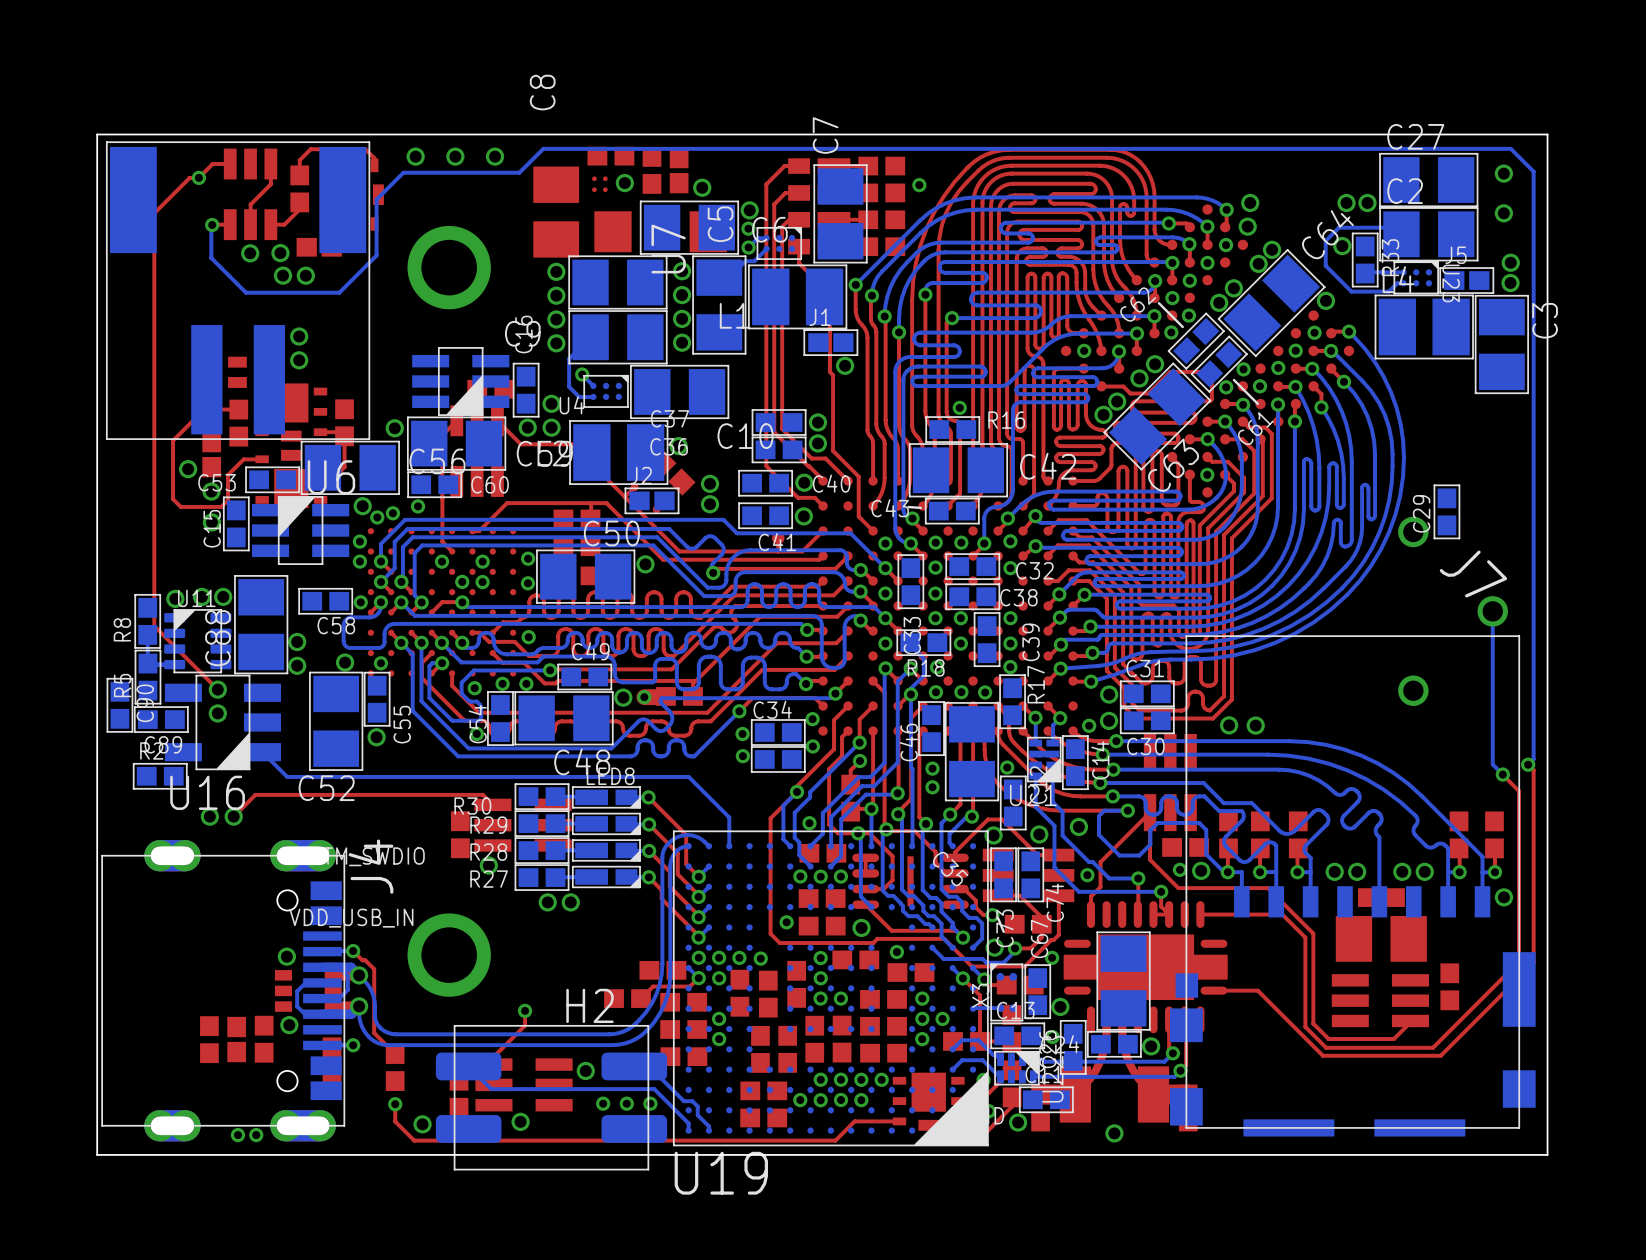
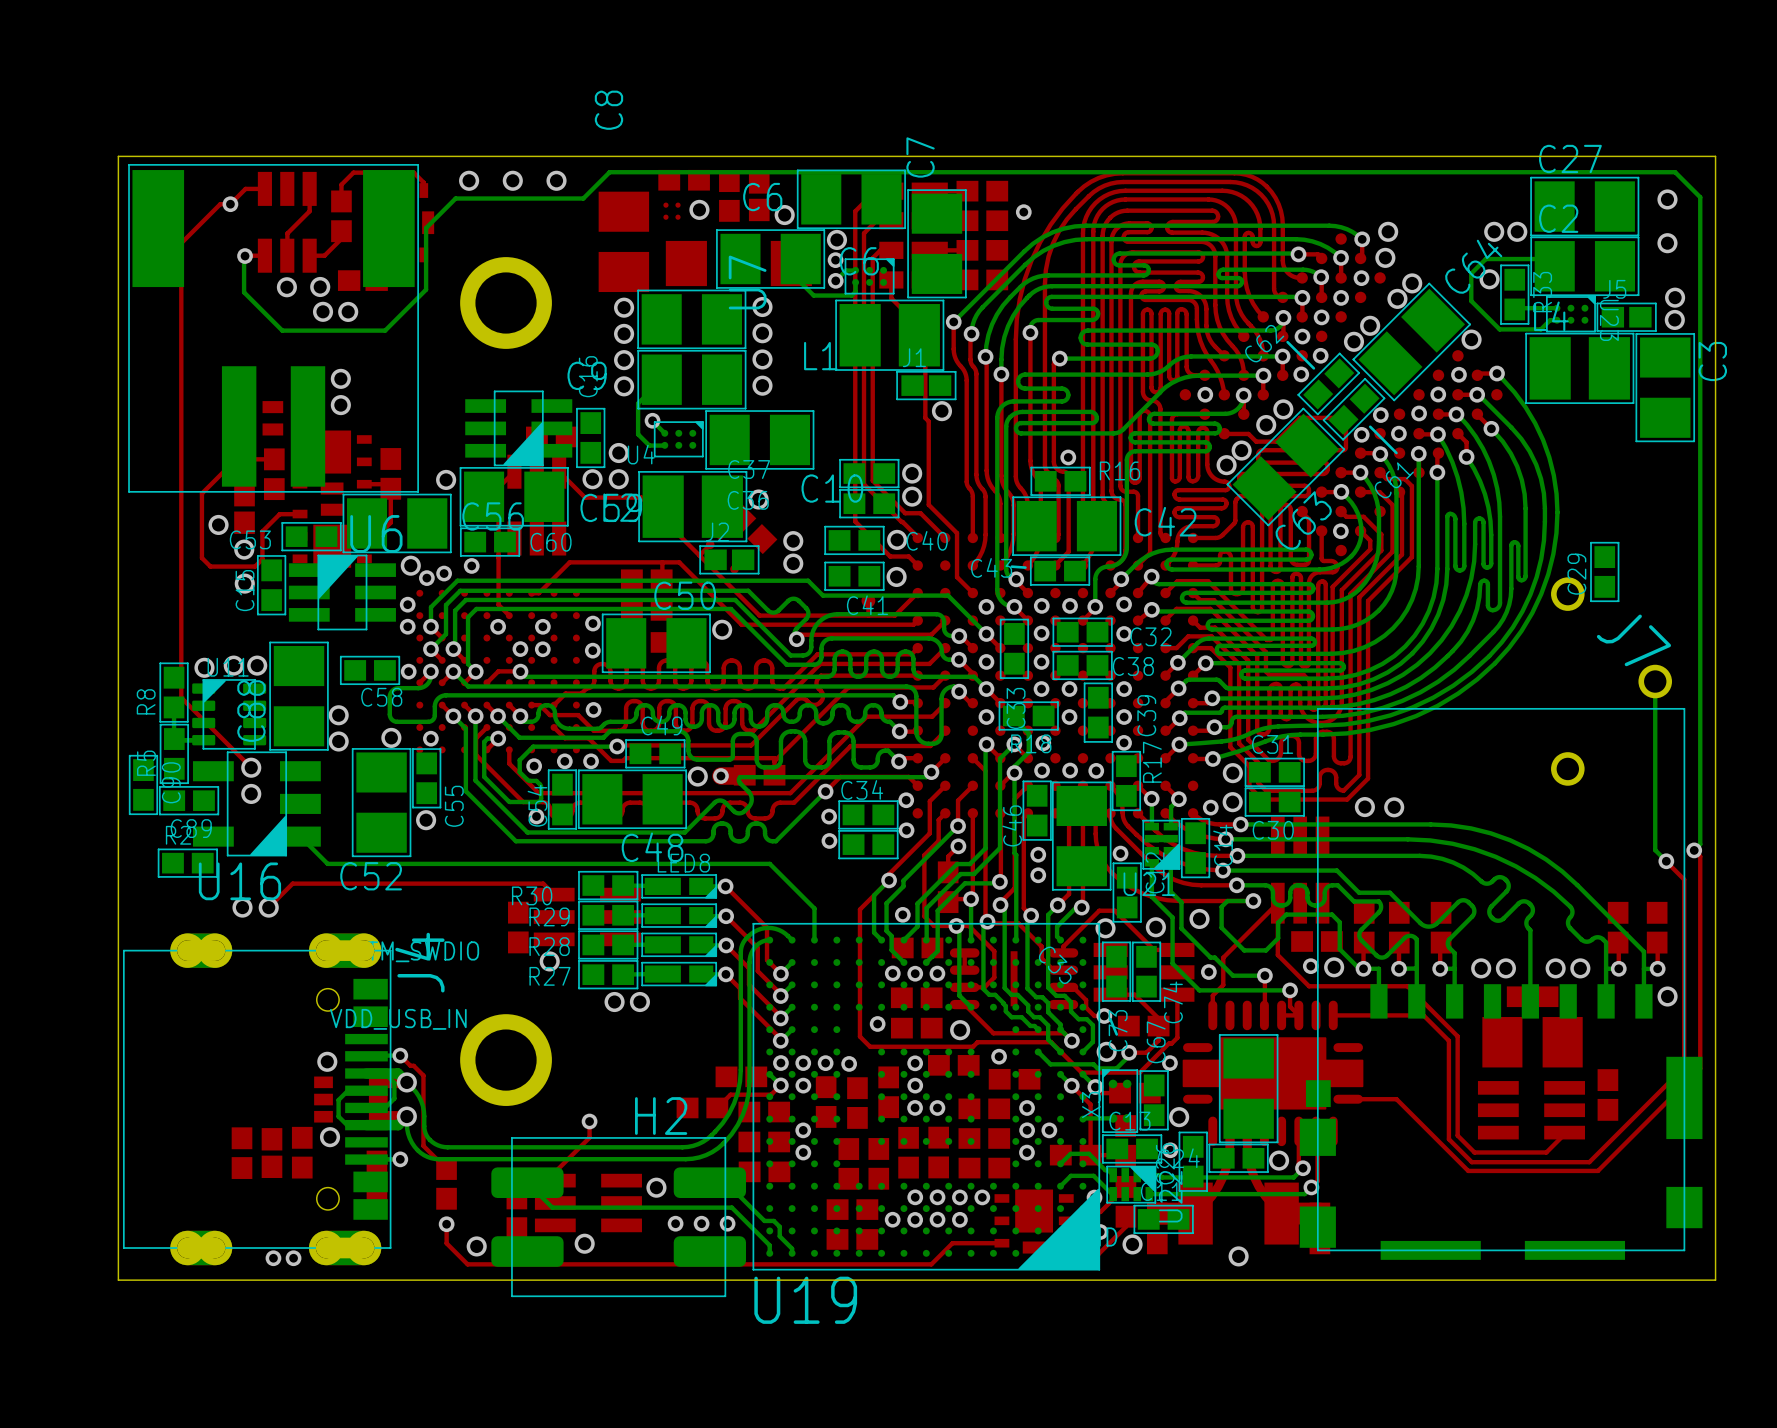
C6: none -> (851, 199)
bottom track: (766, 249) (754, 261) (745, 261) (729, 277) (719, 277) -> (855, 282) (855, 291) (851, 295) (813, 295) (801, 283) (801, 259)
C5: (719, 305) -> none

